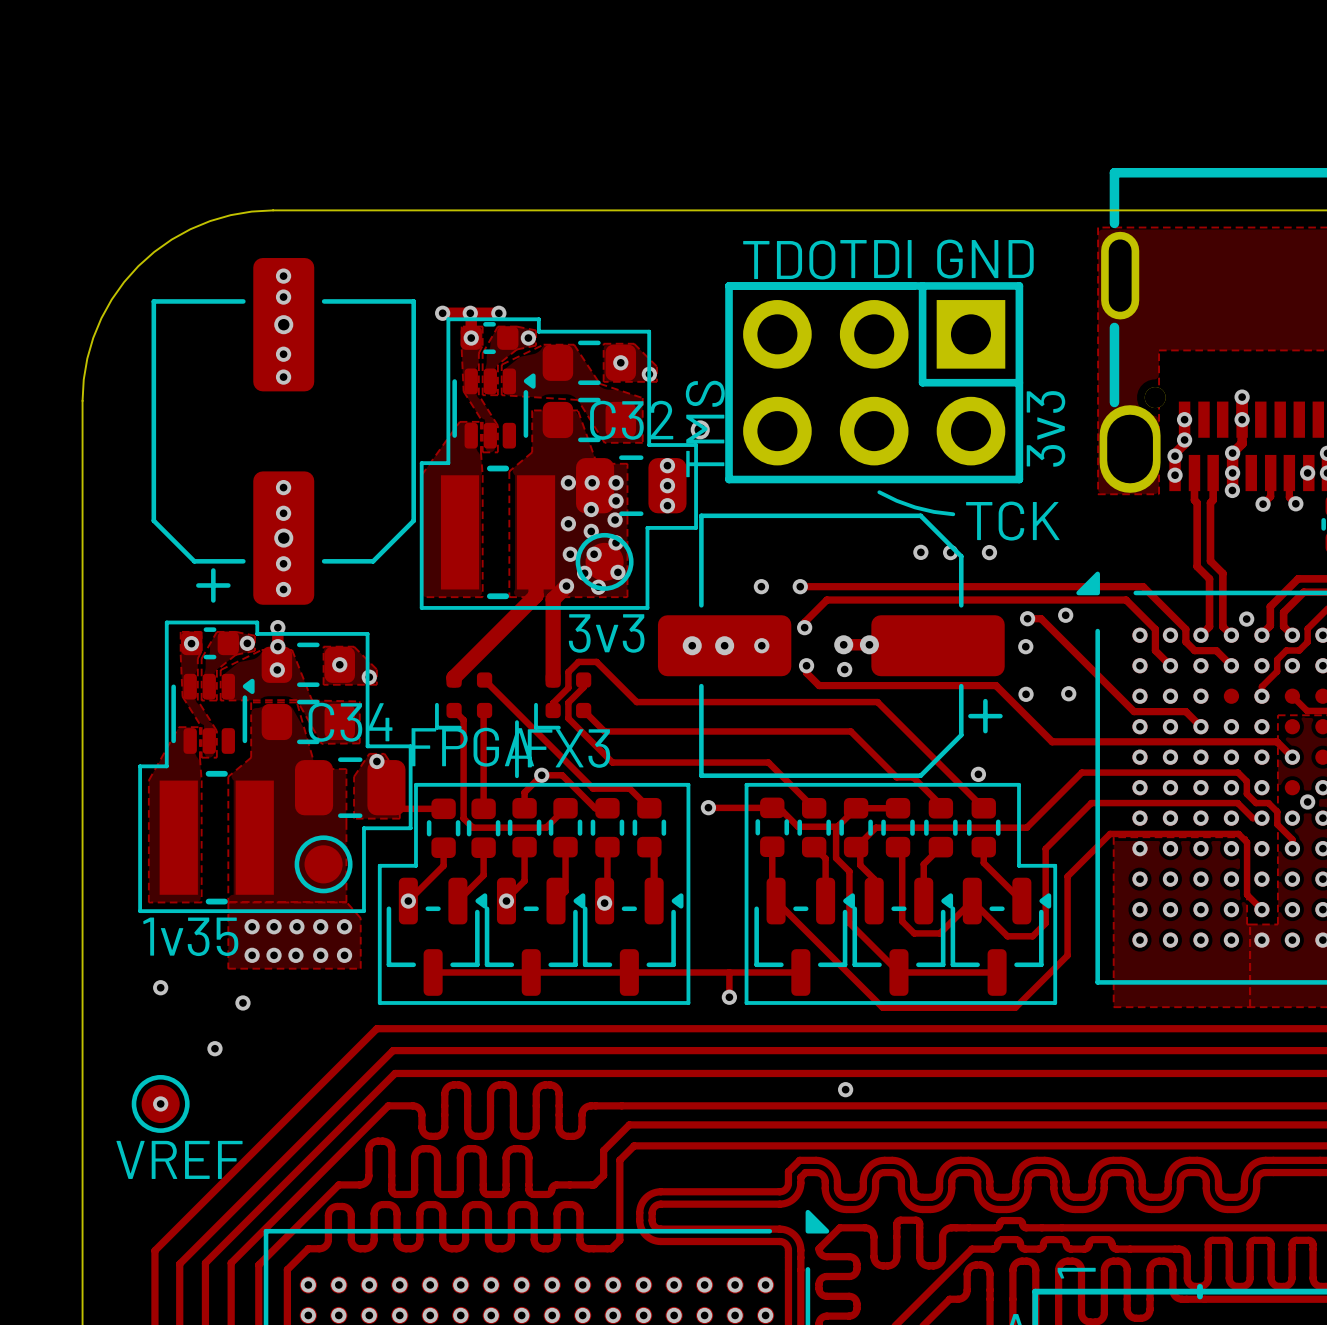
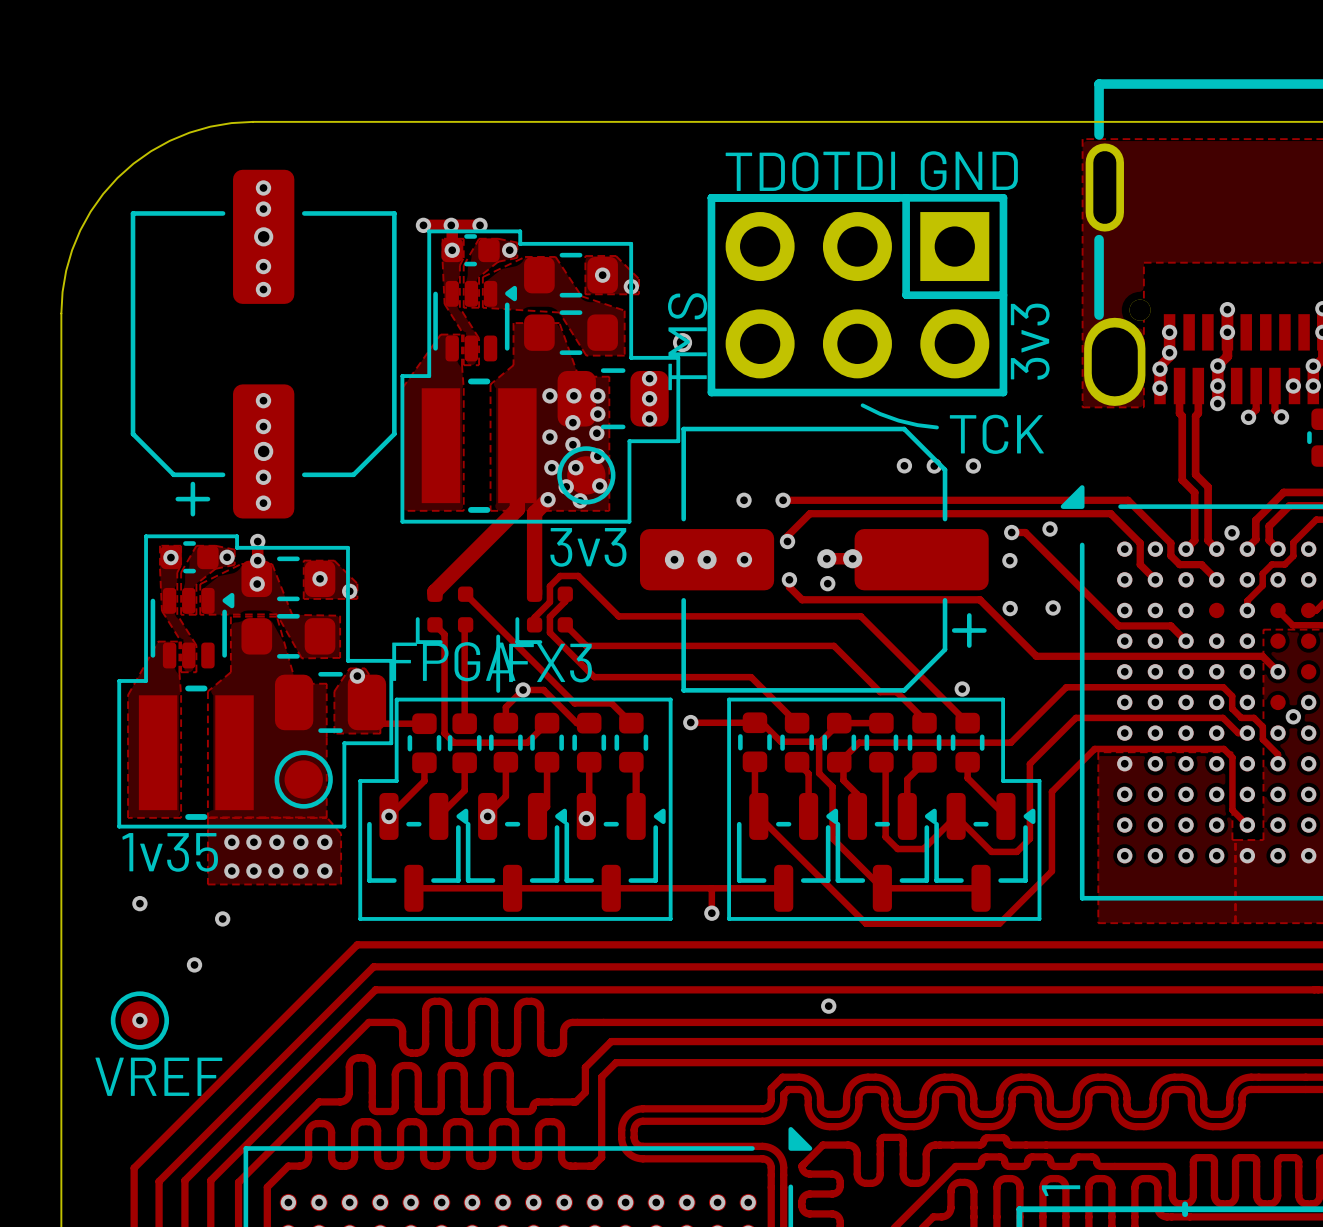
C32 name: C32 (631, 420) -> none
C34 name: C34 (350, 722) -> none

